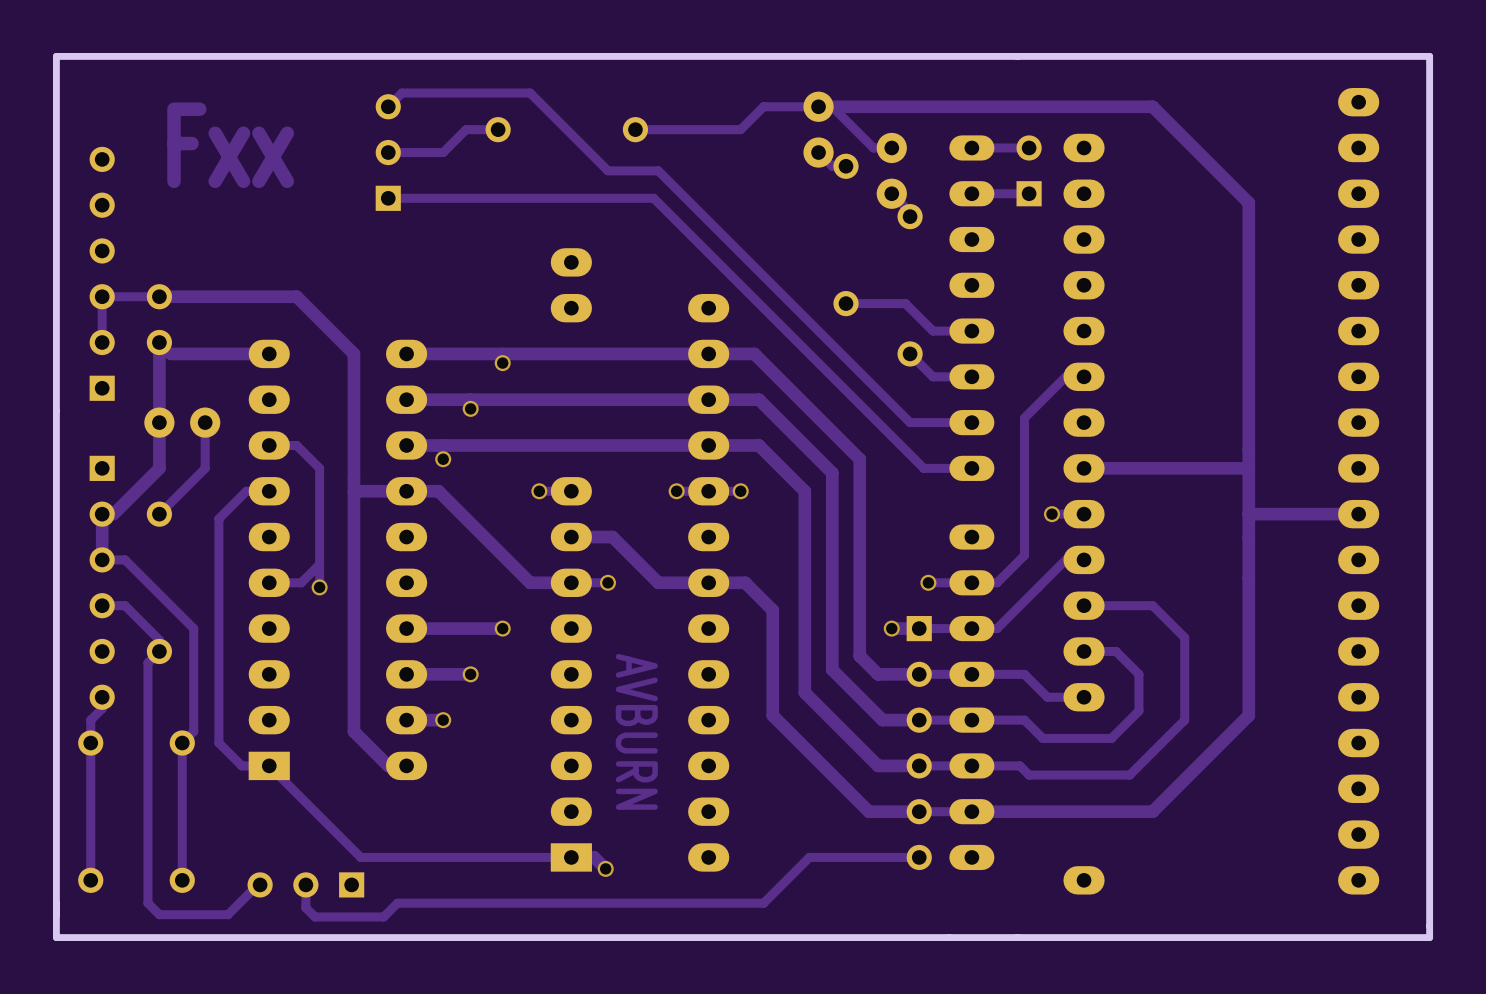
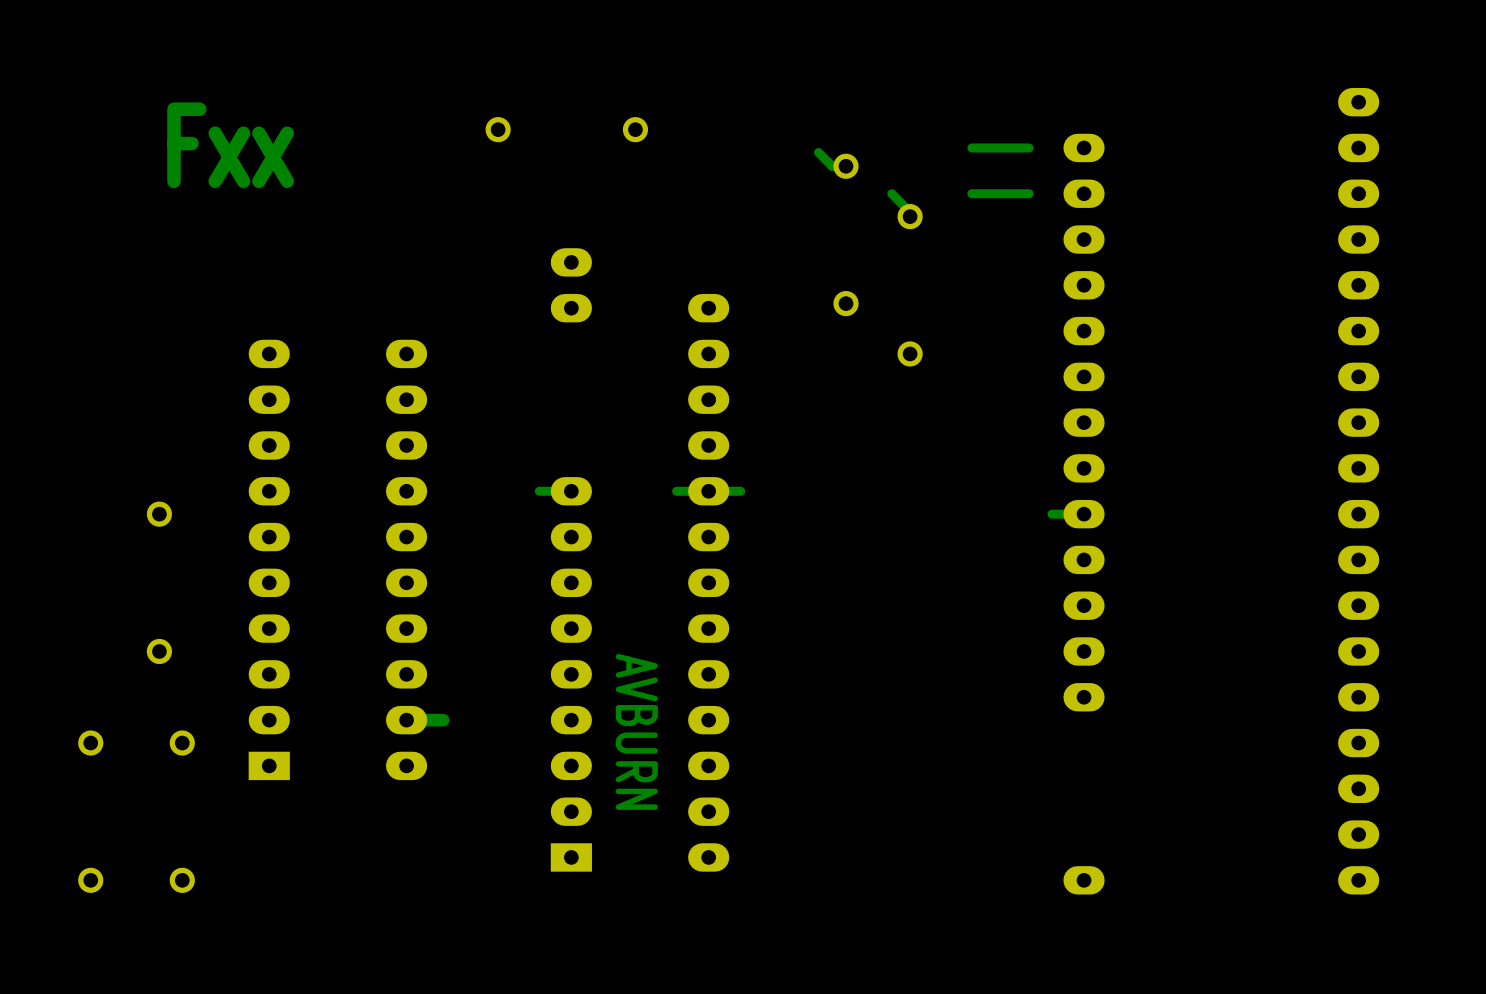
board edge: (1429, 56) (1429, 937) (56, 937) (56, 56) (1429, 56) -> none
track: (388, 106) (402, 93) (530, 93) (607, 170) (658, 170) (910, 422) (971, 422) -> none
track: (818, 106) (1152, 106) (1248, 202) (1248, 715) (1152, 811) (868, 811) (772, 715) (772, 610) (745, 582) (658, 582) (612, 537) (571, 537) -> none
track: (498, 129) (466, 129) (443, 152) (388, 152) -> none
track: (635, 129) (740, 129) (763, 106) (832, 106) (873, 147) (891, 147) -> none
part: (818, 129) -> none
part: (388, 152) -> none
part: (891, 170) -> none
part: (1029, 170) -> none
track: (388, 198) (653, 198) (923, 468) (971, 468) -> none
part: (102, 273) -> none
track: (846, 303) (905, 303) (932, 331) (971, 331) -> none
part: (971, 308) -> none
part: (159, 319) -> none
track: (102, 342) (102, 296) (296, 296) (353, 353) (353, 731) (388, 765) (406, 765) -> none
track: (269, 353) (170, 353) (159, 342) (159, 468) (113, 514) (102, 514) (102, 559) (125, 559) (193, 628) (193, 731) (182, 743) (182, 880) -> none
track: (406, 353) (754, 353) (859, 459) (859, 656) (878, 674) (1024, 674) (1047, 697) (1084, 697) -> none
track: (910, 353) (932, 376) (971, 376) -> none
via: (502, 363) -> none
track: (1084, 376) (1065, 376) (1024, 418) (1024, 555) (997, 582) (928, 582) -> none
track: (406, 399) (759, 399) (832, 472) (832, 669) (882, 720) (1024, 720) (1042, 738) (1111, 738) (1138, 710) (1138, 674) (1116, 651) (1084, 651) -> none
via: (470, 408) -> none
part: (182, 422) -> none
track: (205, 422) (205, 468) (159, 514) -> none
track: (269, 445) (296, 445) (319, 468) (319, 587) -> none
track: (406, 445) (759, 445) (804, 491) (804, 692) (878, 765) (1019, 765) (1029, 775) (1129, 775) (1184, 720) (1184, 637) (1152, 605) (1084, 605) -> none
via: (443, 459) -> none
track: (1248, 468) (1084, 468) -> none
track: (353, 479) (353, 491) (438, 491) (530, 582) (607, 582) -> none
track: (269, 491) (246, 491) (218, 518) (218, 743) (241, 765) (269, 765) (360, 857) (594, 857) (605, 868) -> none
via: (539, 491) -> none
via: (676, 491) -> none
via: (740, 491) -> none
via: (1051, 514) -> none
track: (1358, 514) (1248, 514) -> none
track: (1084, 559) (1065, 559) (997, 628) (891, 628) -> none
track: (319, 564) (301, 582) (269, 582) -> none
part: (102, 582) -> none
via: (607, 582) -> none
via: (928, 582) -> none
via: (319, 587) -> none
track: (102, 605) (125, 605) (159, 640) (159, 651) (147, 662) (147, 903) (159, 914) (228, 914) (257, 884) (260, 884) -> none
track: (502, 628) (406, 628) -> none
via: (502, 628) -> none
via: (891, 628) -> none
track: (470, 674) (406, 674) -> none
via: (470, 674) -> none
track: (102, 697) (102, 708) (90, 720) (90, 880) -> none
part: (971, 697) -> none
via: (443, 720) -> none
part: (919, 743) -> none
track: (919, 857) (809, 857) (763, 903) (397, 903) (383, 916) (315, 916) (305, 907) (305, 884) -> none
via: (605, 868) -> none
part: (305, 884) -> none

